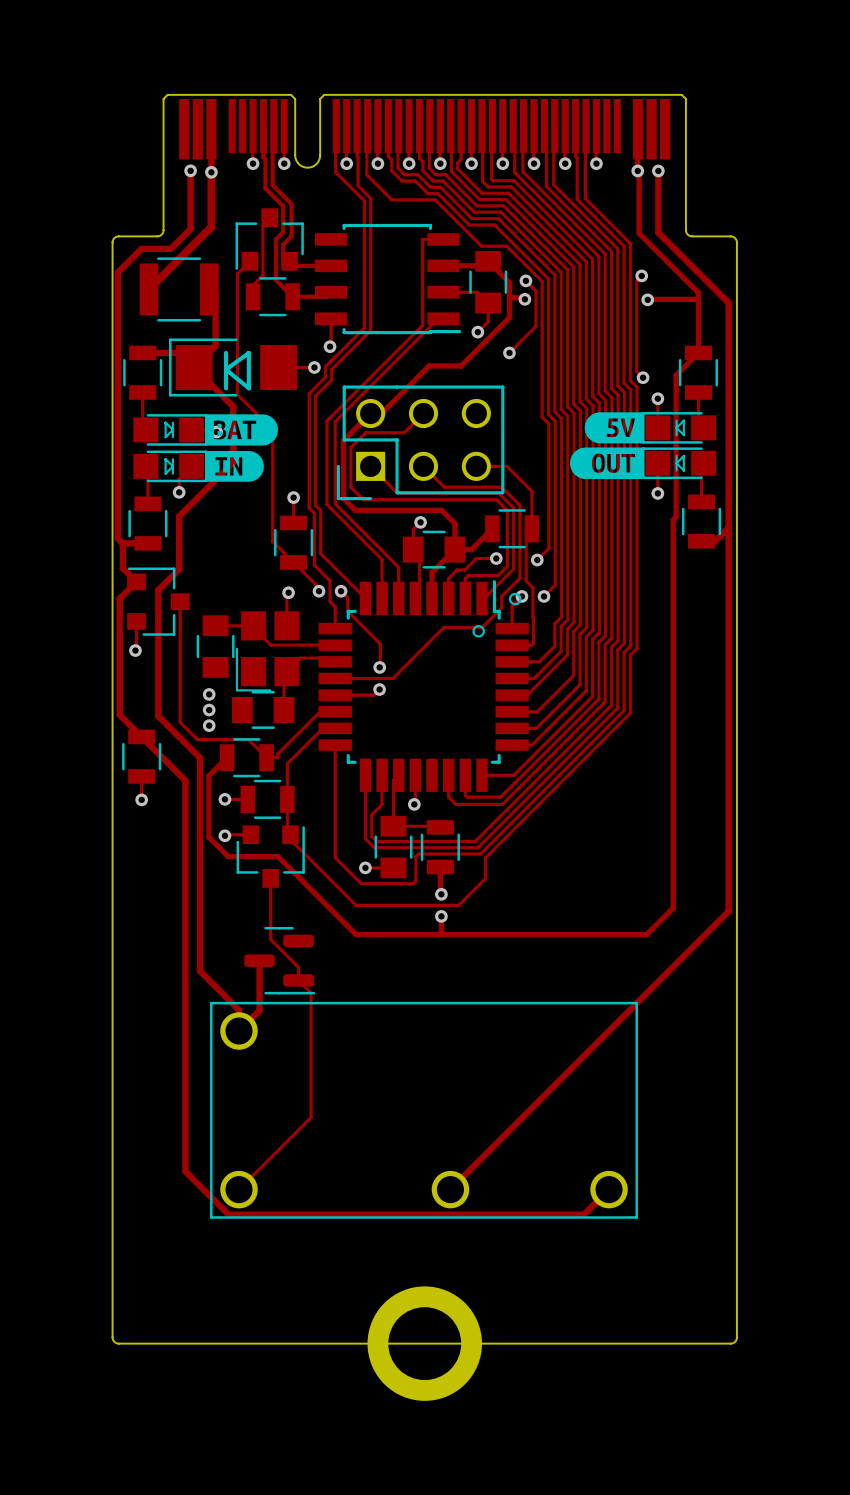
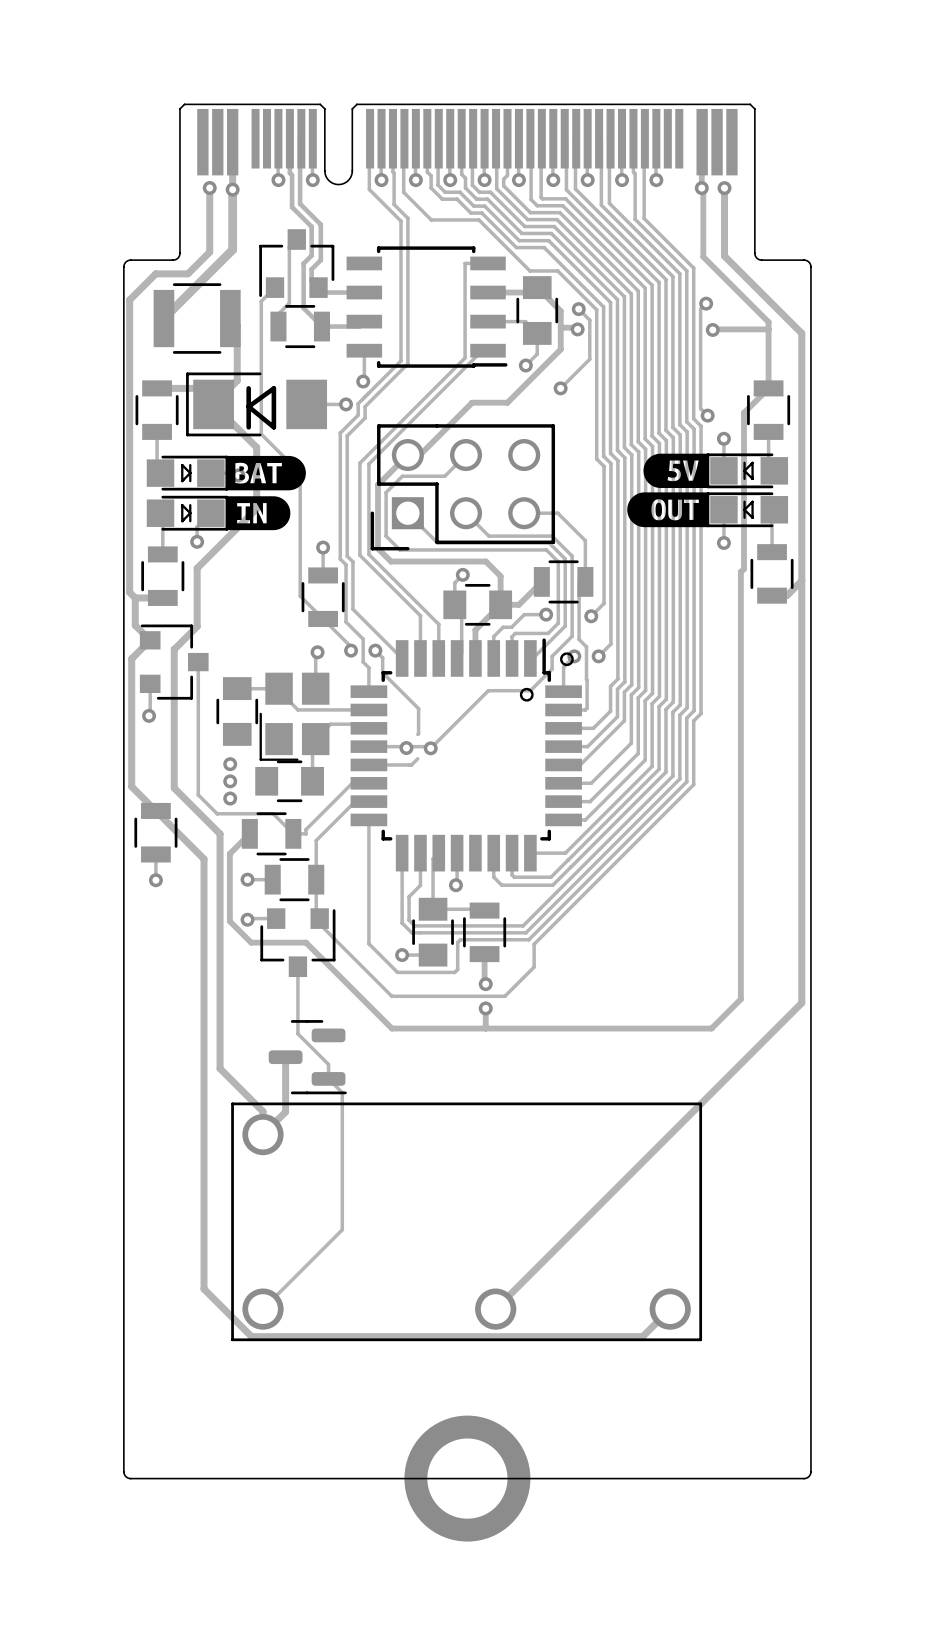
via: (379, 667) -> none
via: none -> (406, 748)
via: none -> (430, 748)
via: (379, 689) -> none

